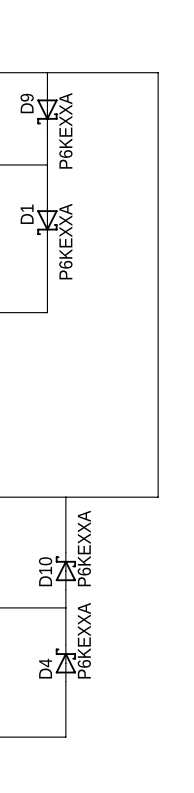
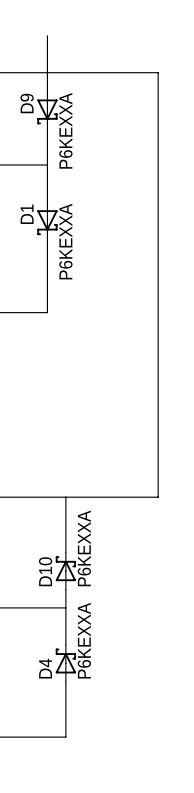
wire: none -> (47, 35) (47, 72)

